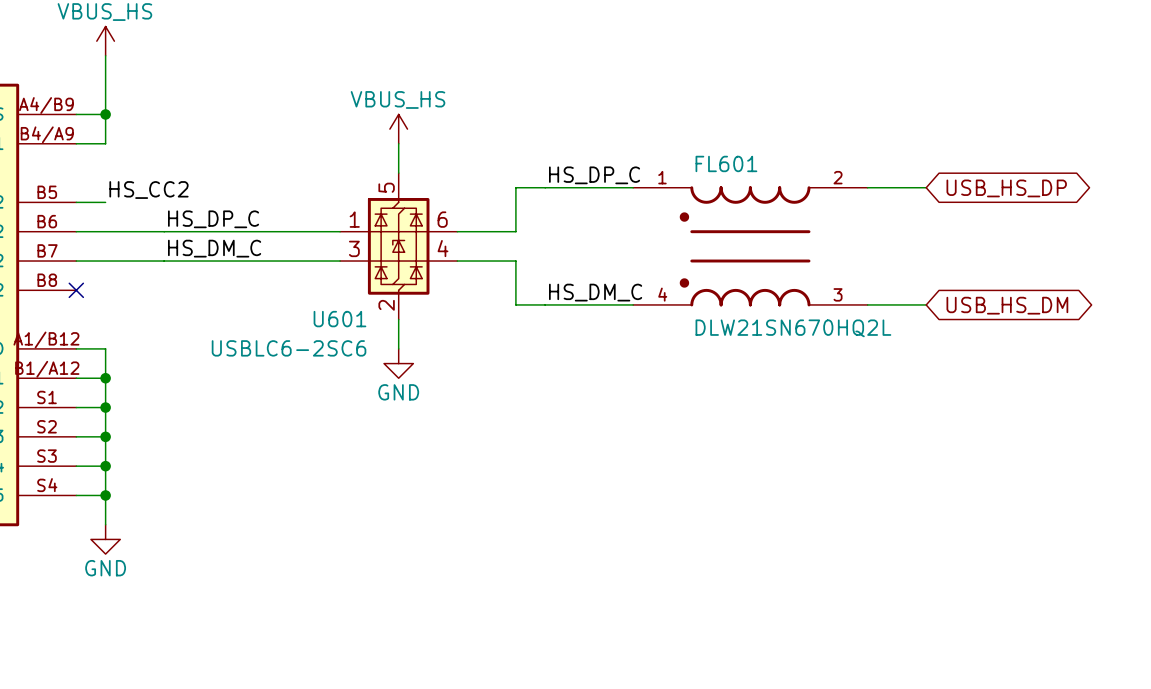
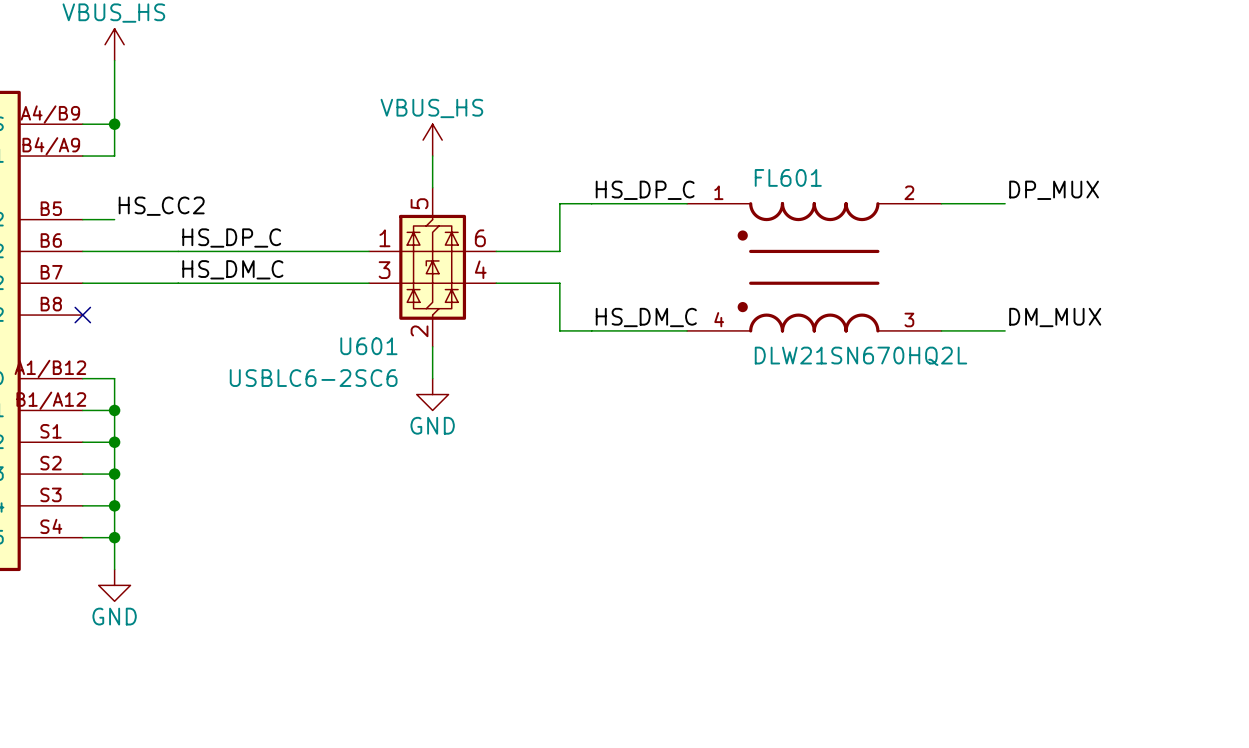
label: none -> DP_MUX (1054, 190)
global label: USB_HS_DP (1006, 188) -> none
label: none -> DM_MUX (1055, 317)
global label: USB_HS_DM (1007, 305) -> none

